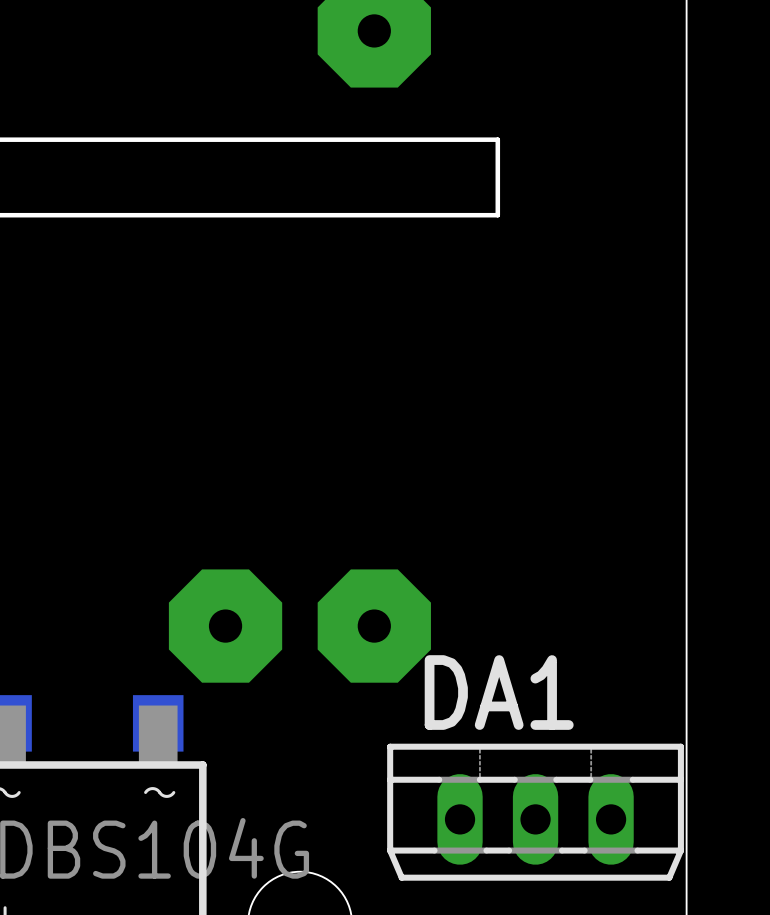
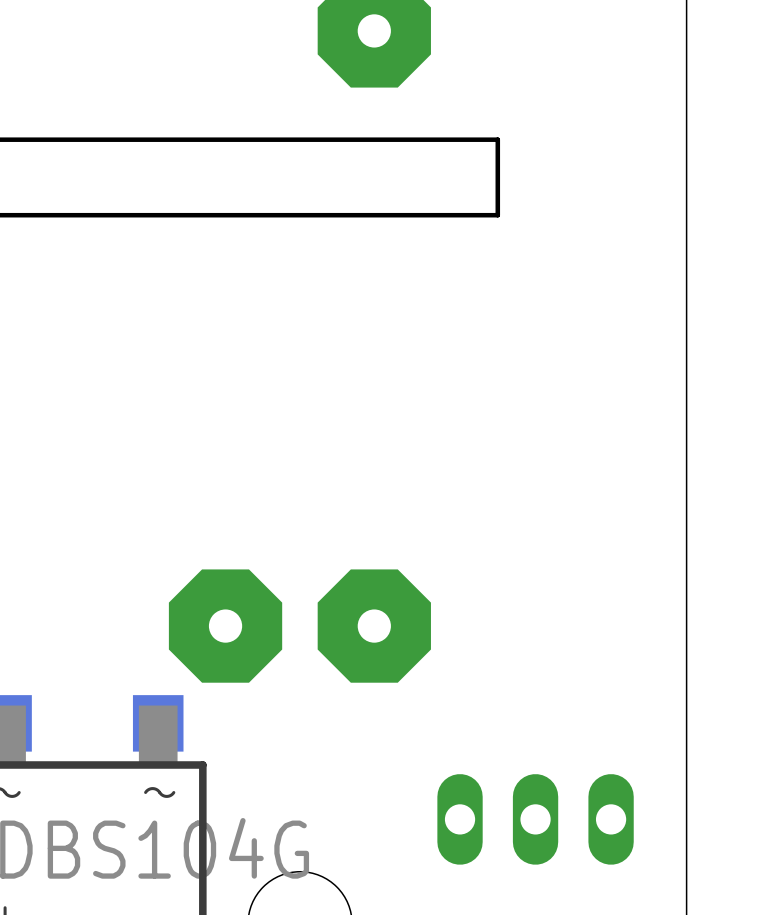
DA1 side: bottom (535, 812) -> top (535, 819)

